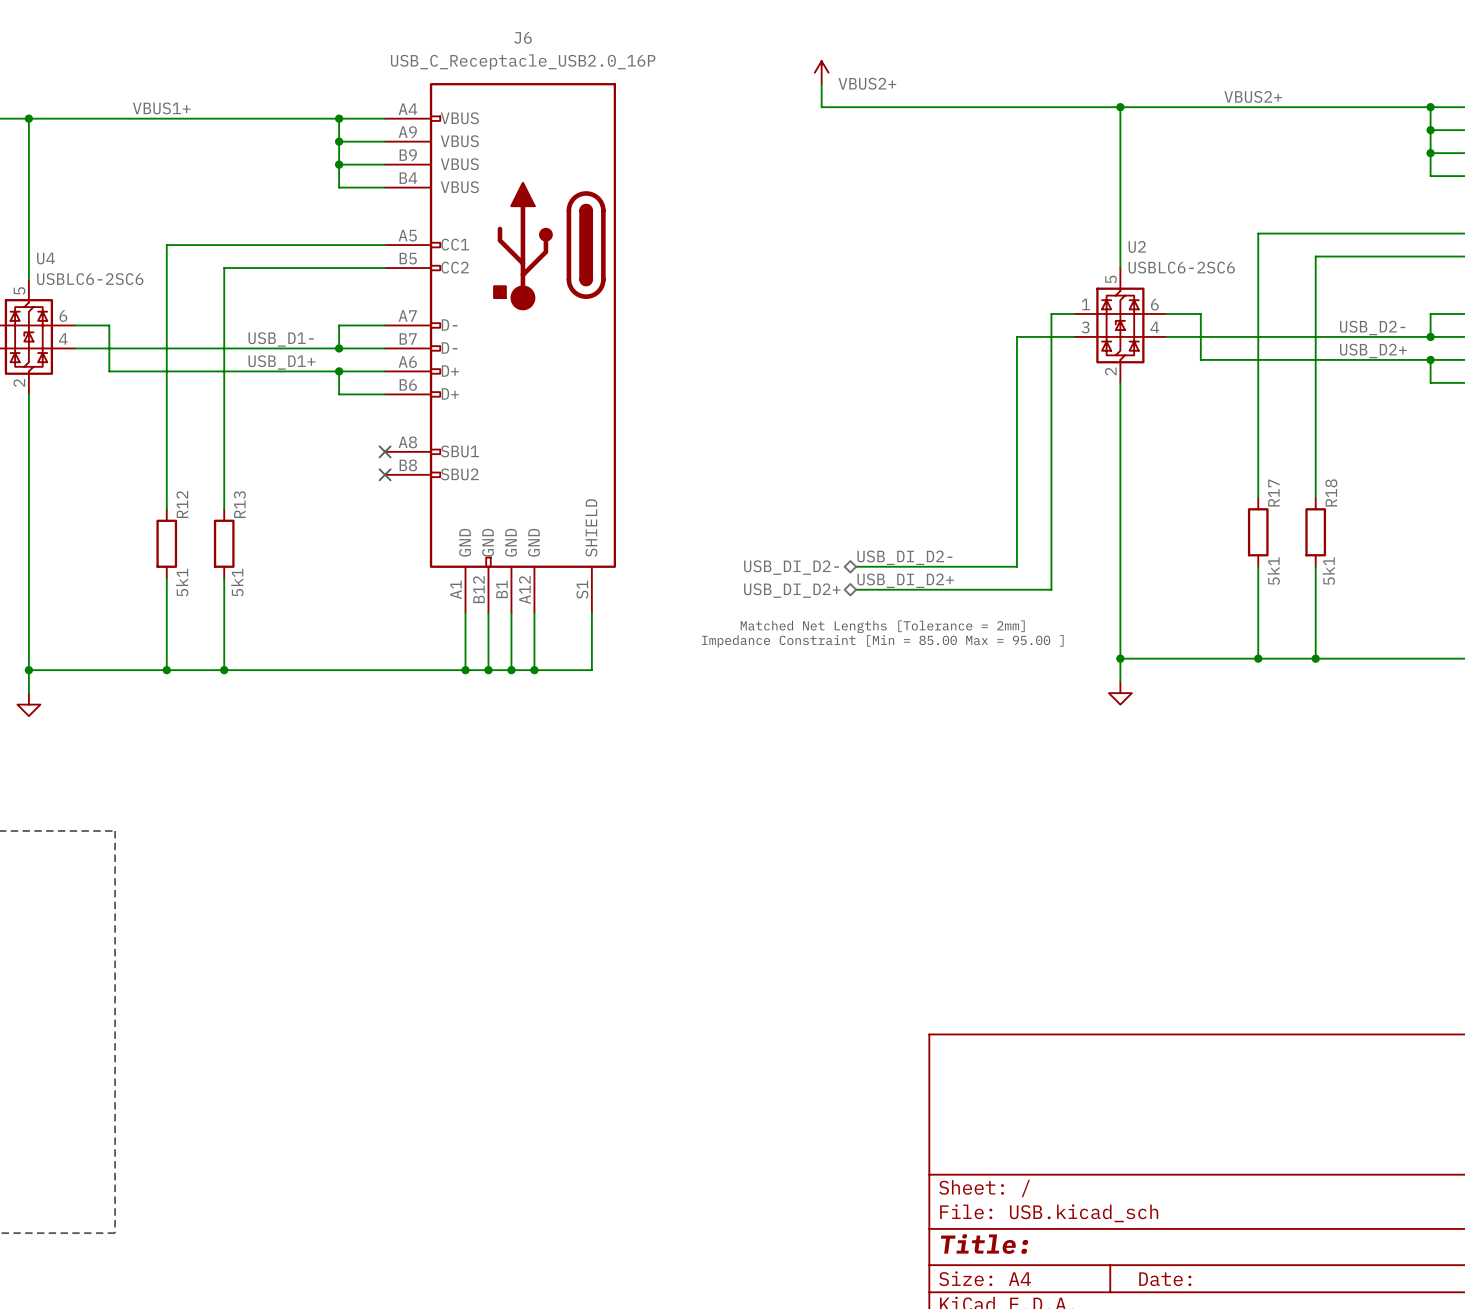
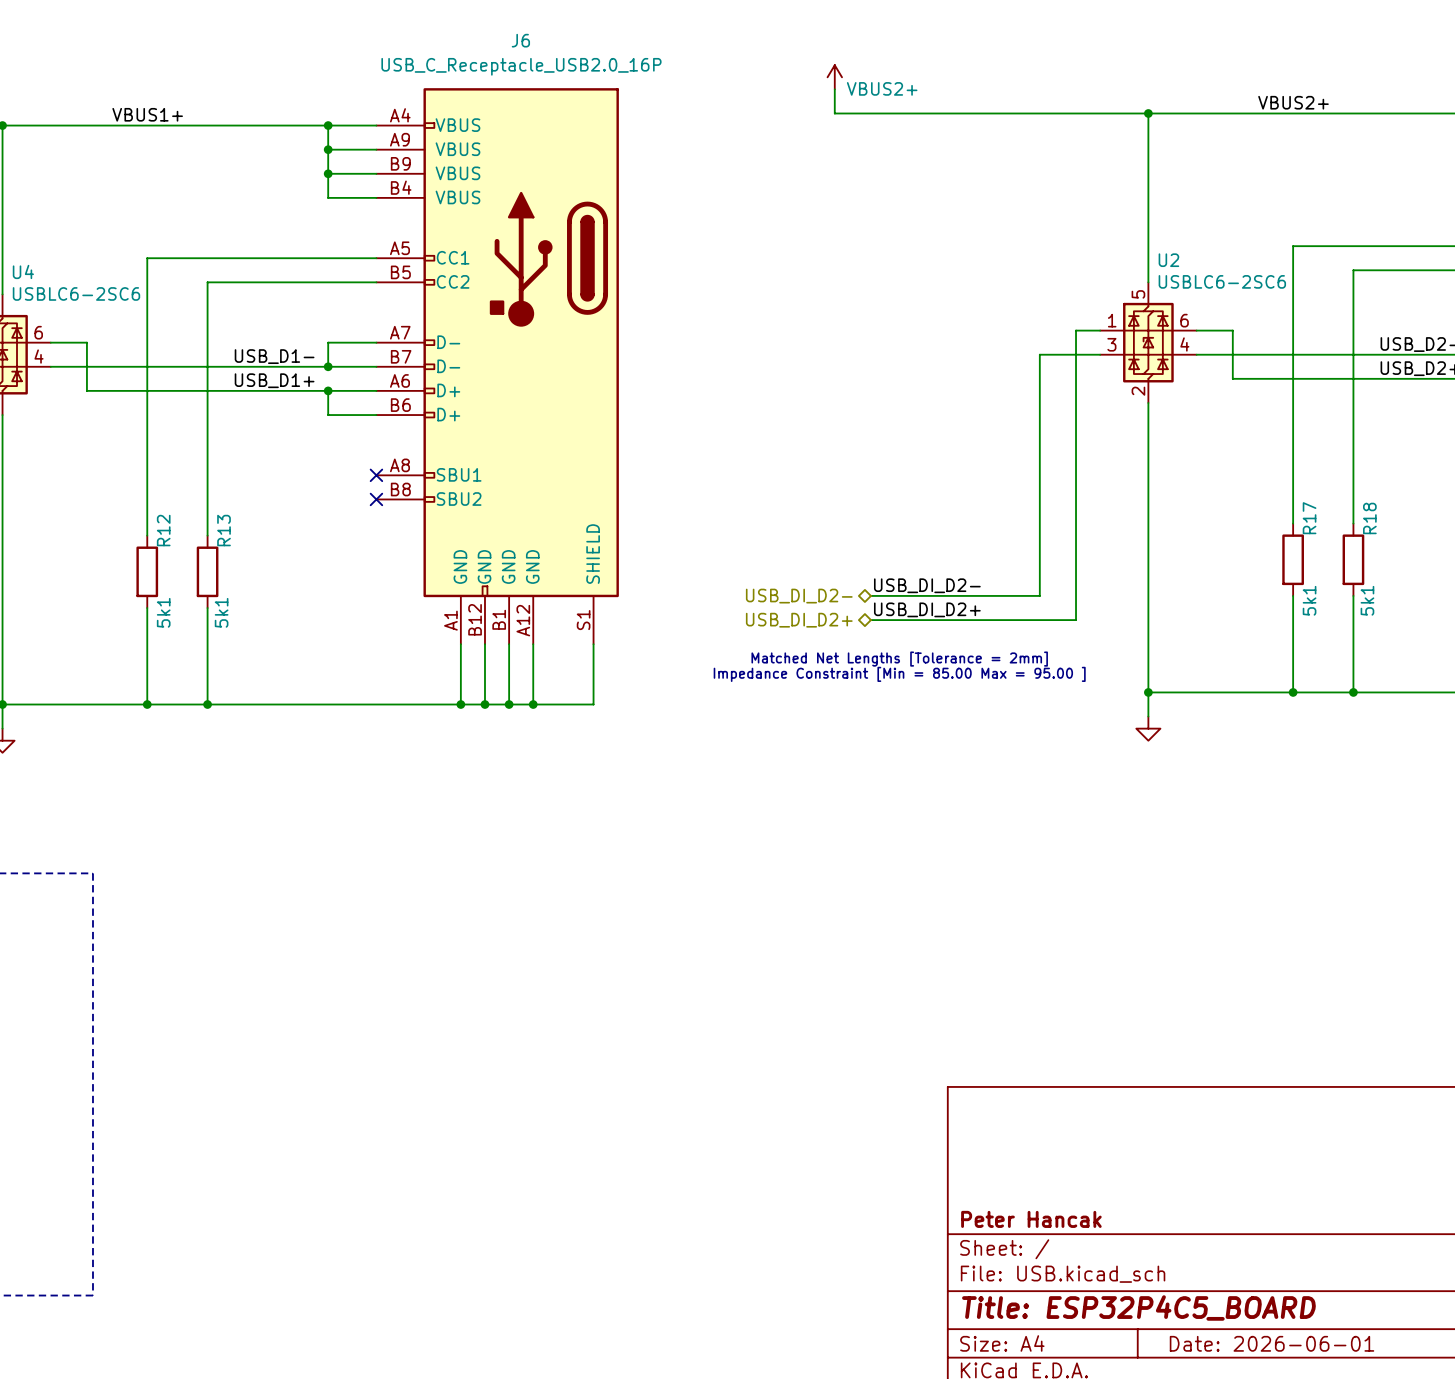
title block: none -> Peter Hancak (1031, 1219)
title block: Title: (984, 1244) -> Title: ESP32P4C5_BOARD (1138, 1308)
title block: Date: (1165, 1279) -> Date: 2026-06-01 (1272, 1343)

